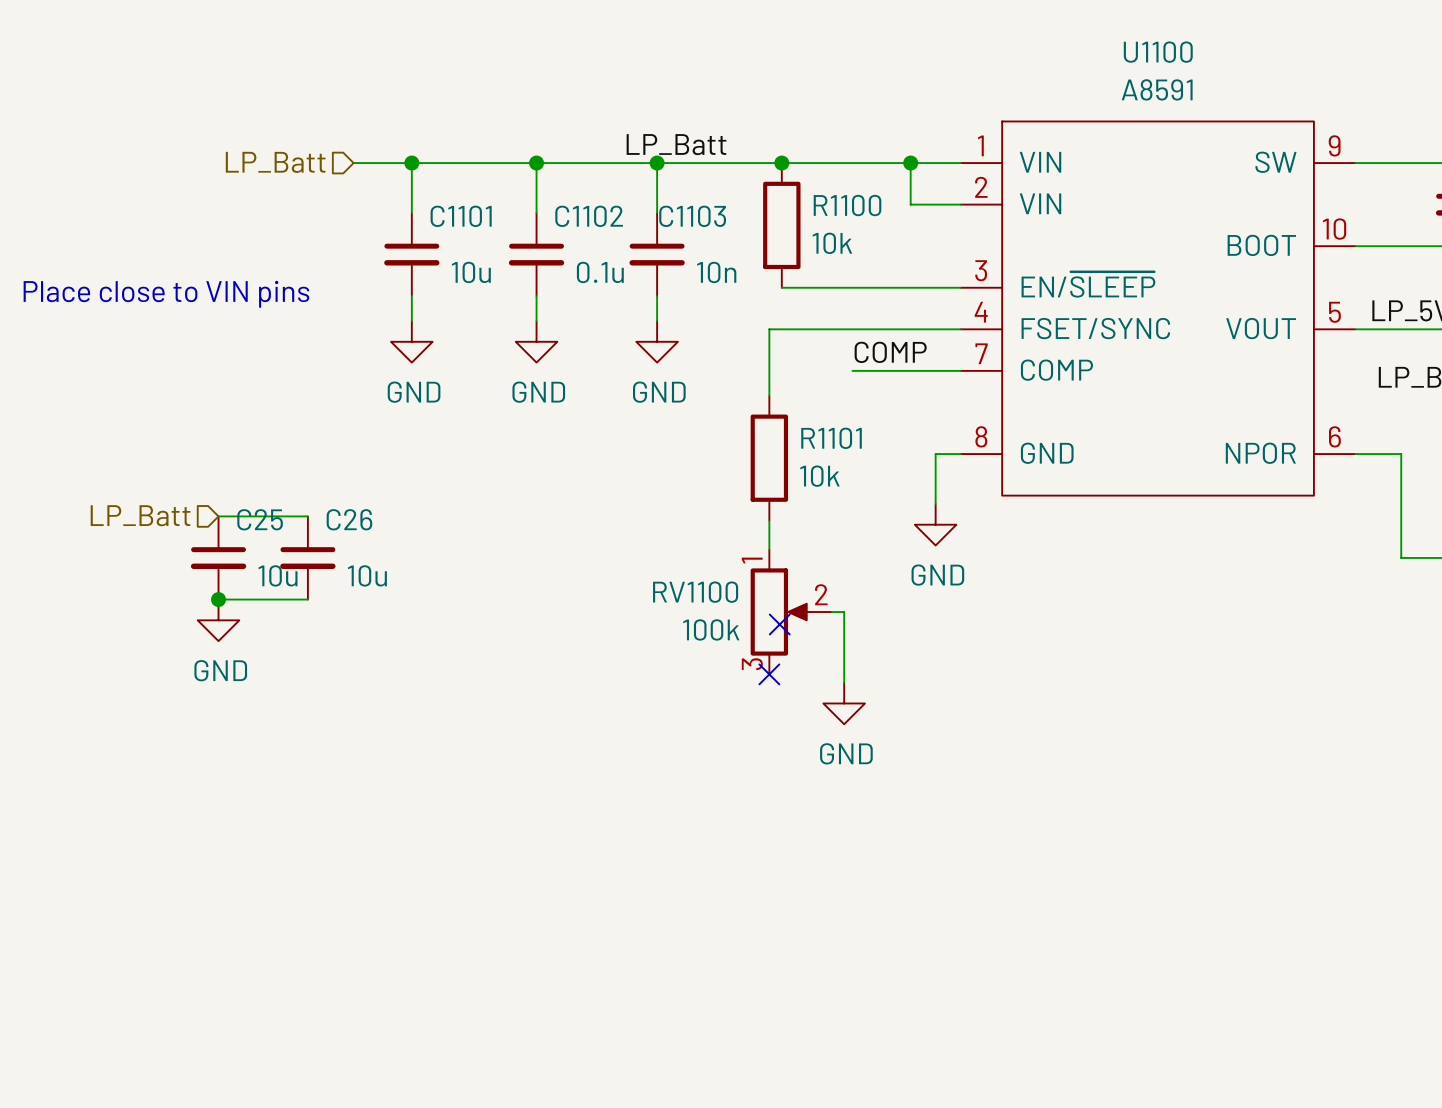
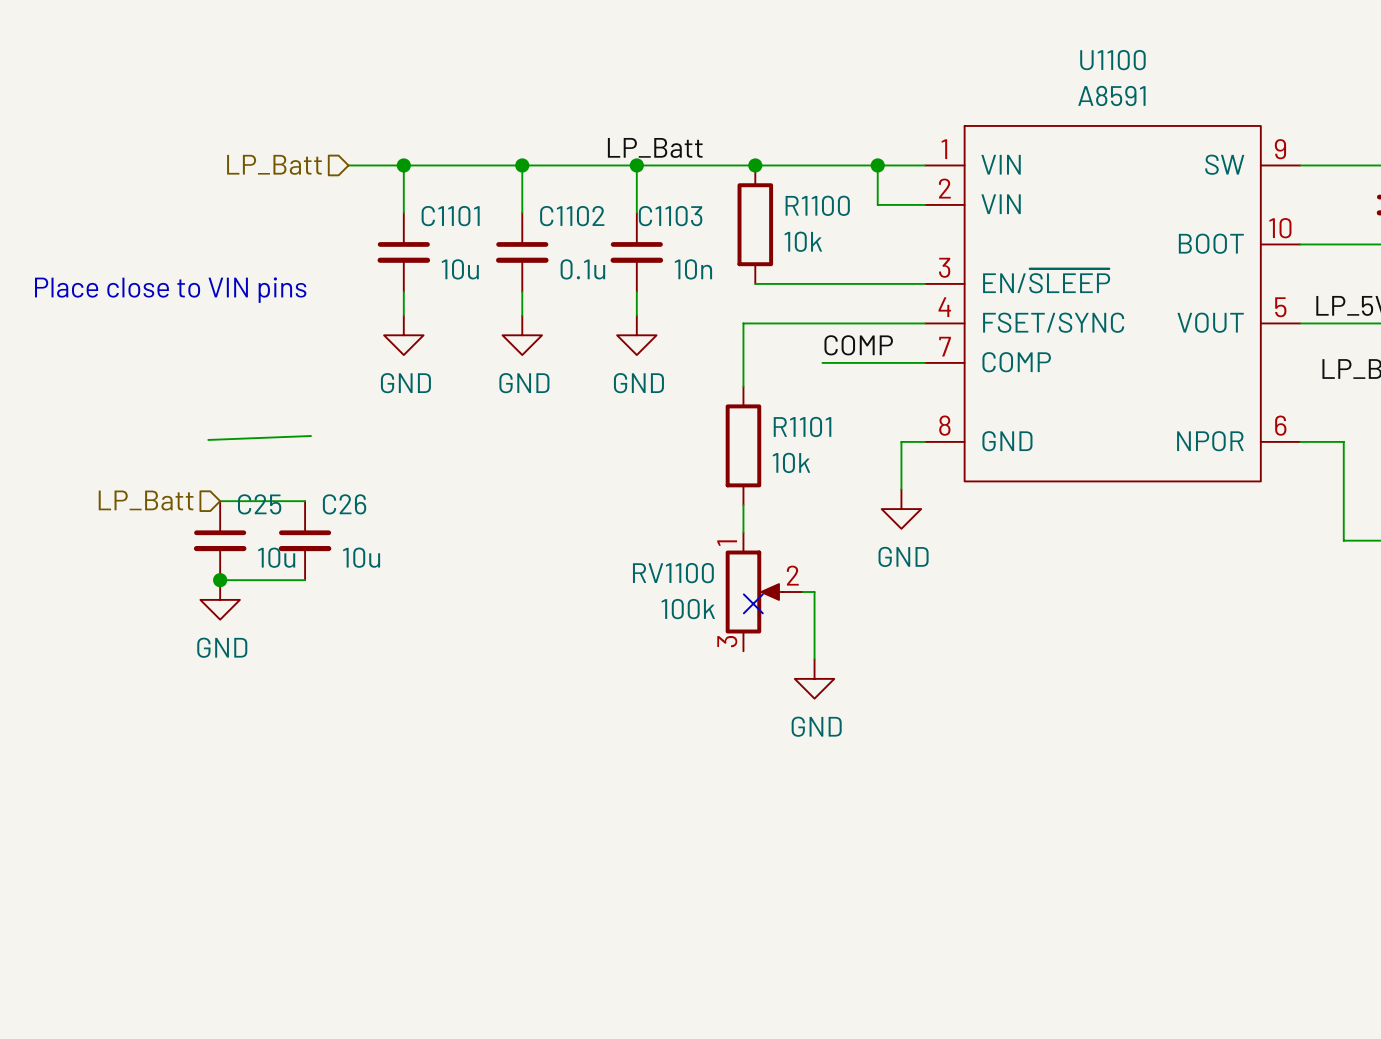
wire: none -> (310, 436) (208, 439)
no-connect mark: (769, 674) -> none

